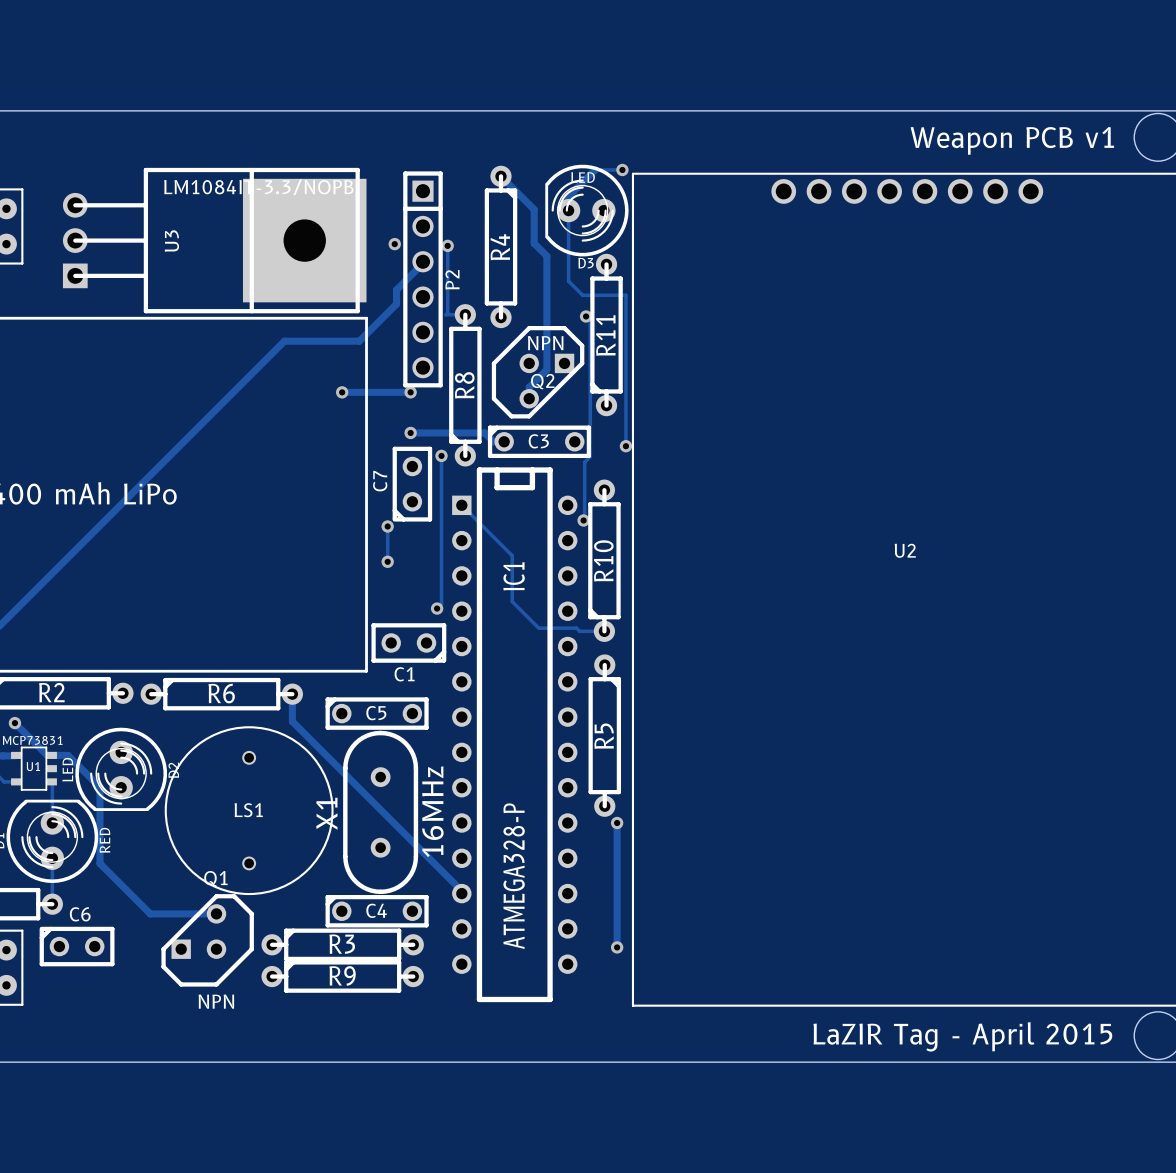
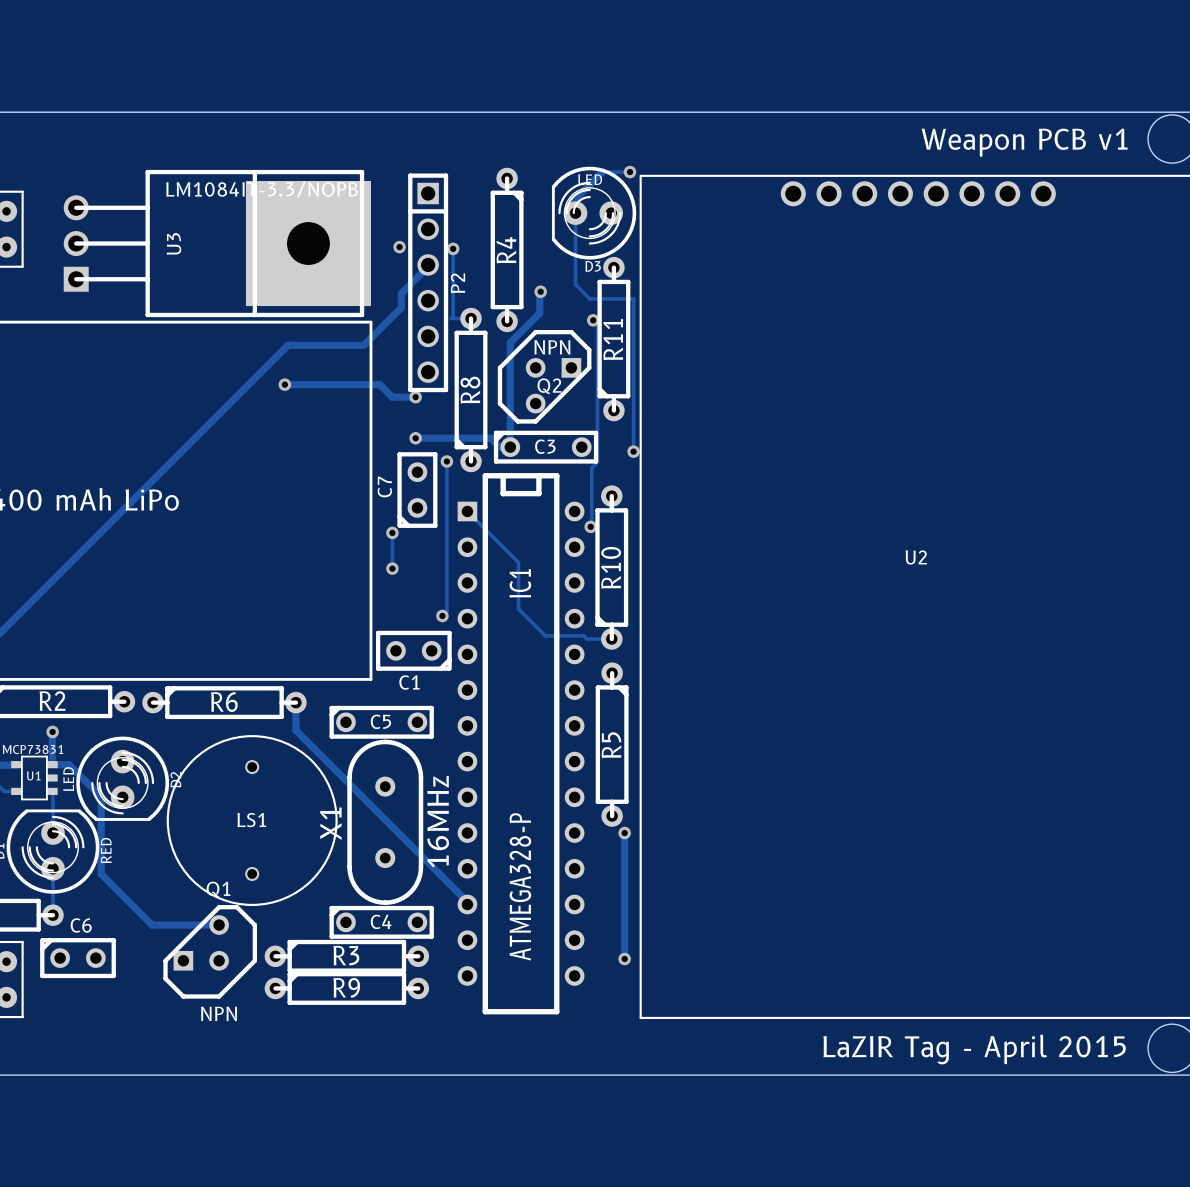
track: (500, 176) (534, 209) (534, 243) (546, 256) (546, 369) (529, 387) (529, 398) -> none
track: none -> (540, 291) (539, 313) (510, 342) (510, 447)
via: none -> (540, 291)
track: (342, 392) (387, 392) -> (284, 384) (379, 384) (392, 397)
via position: (342, 392) -> (284, 384)
track: (14, 723) (47, 755) (51, 755) -> (52, 731) (52, 764)
via position: (14, 723) -> (52, 731)

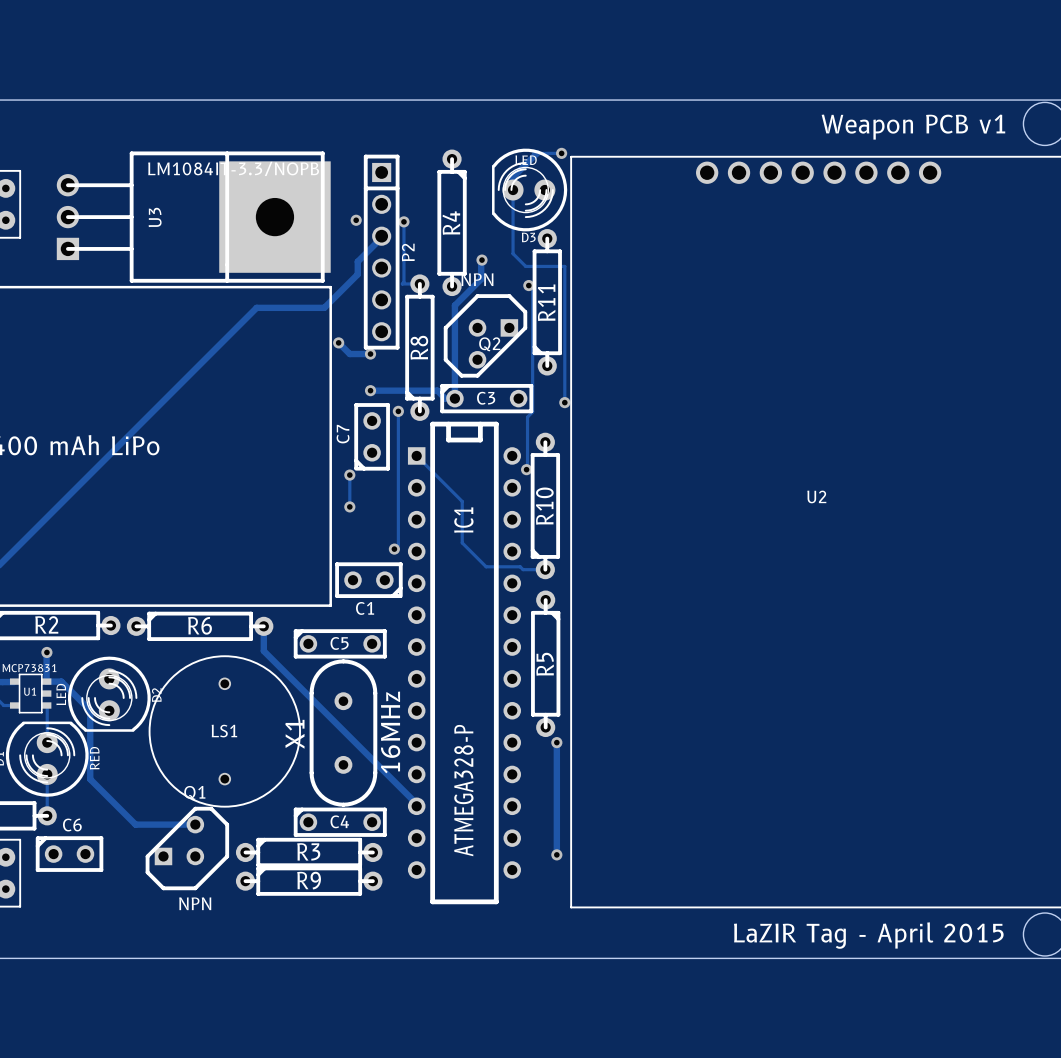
Q2 value position: NPN (552, 347) -> NPN (477, 279)
track: (284, 384) (379, 384) -> none
via: (284, 384) -> none
via: none -> (338, 342)

